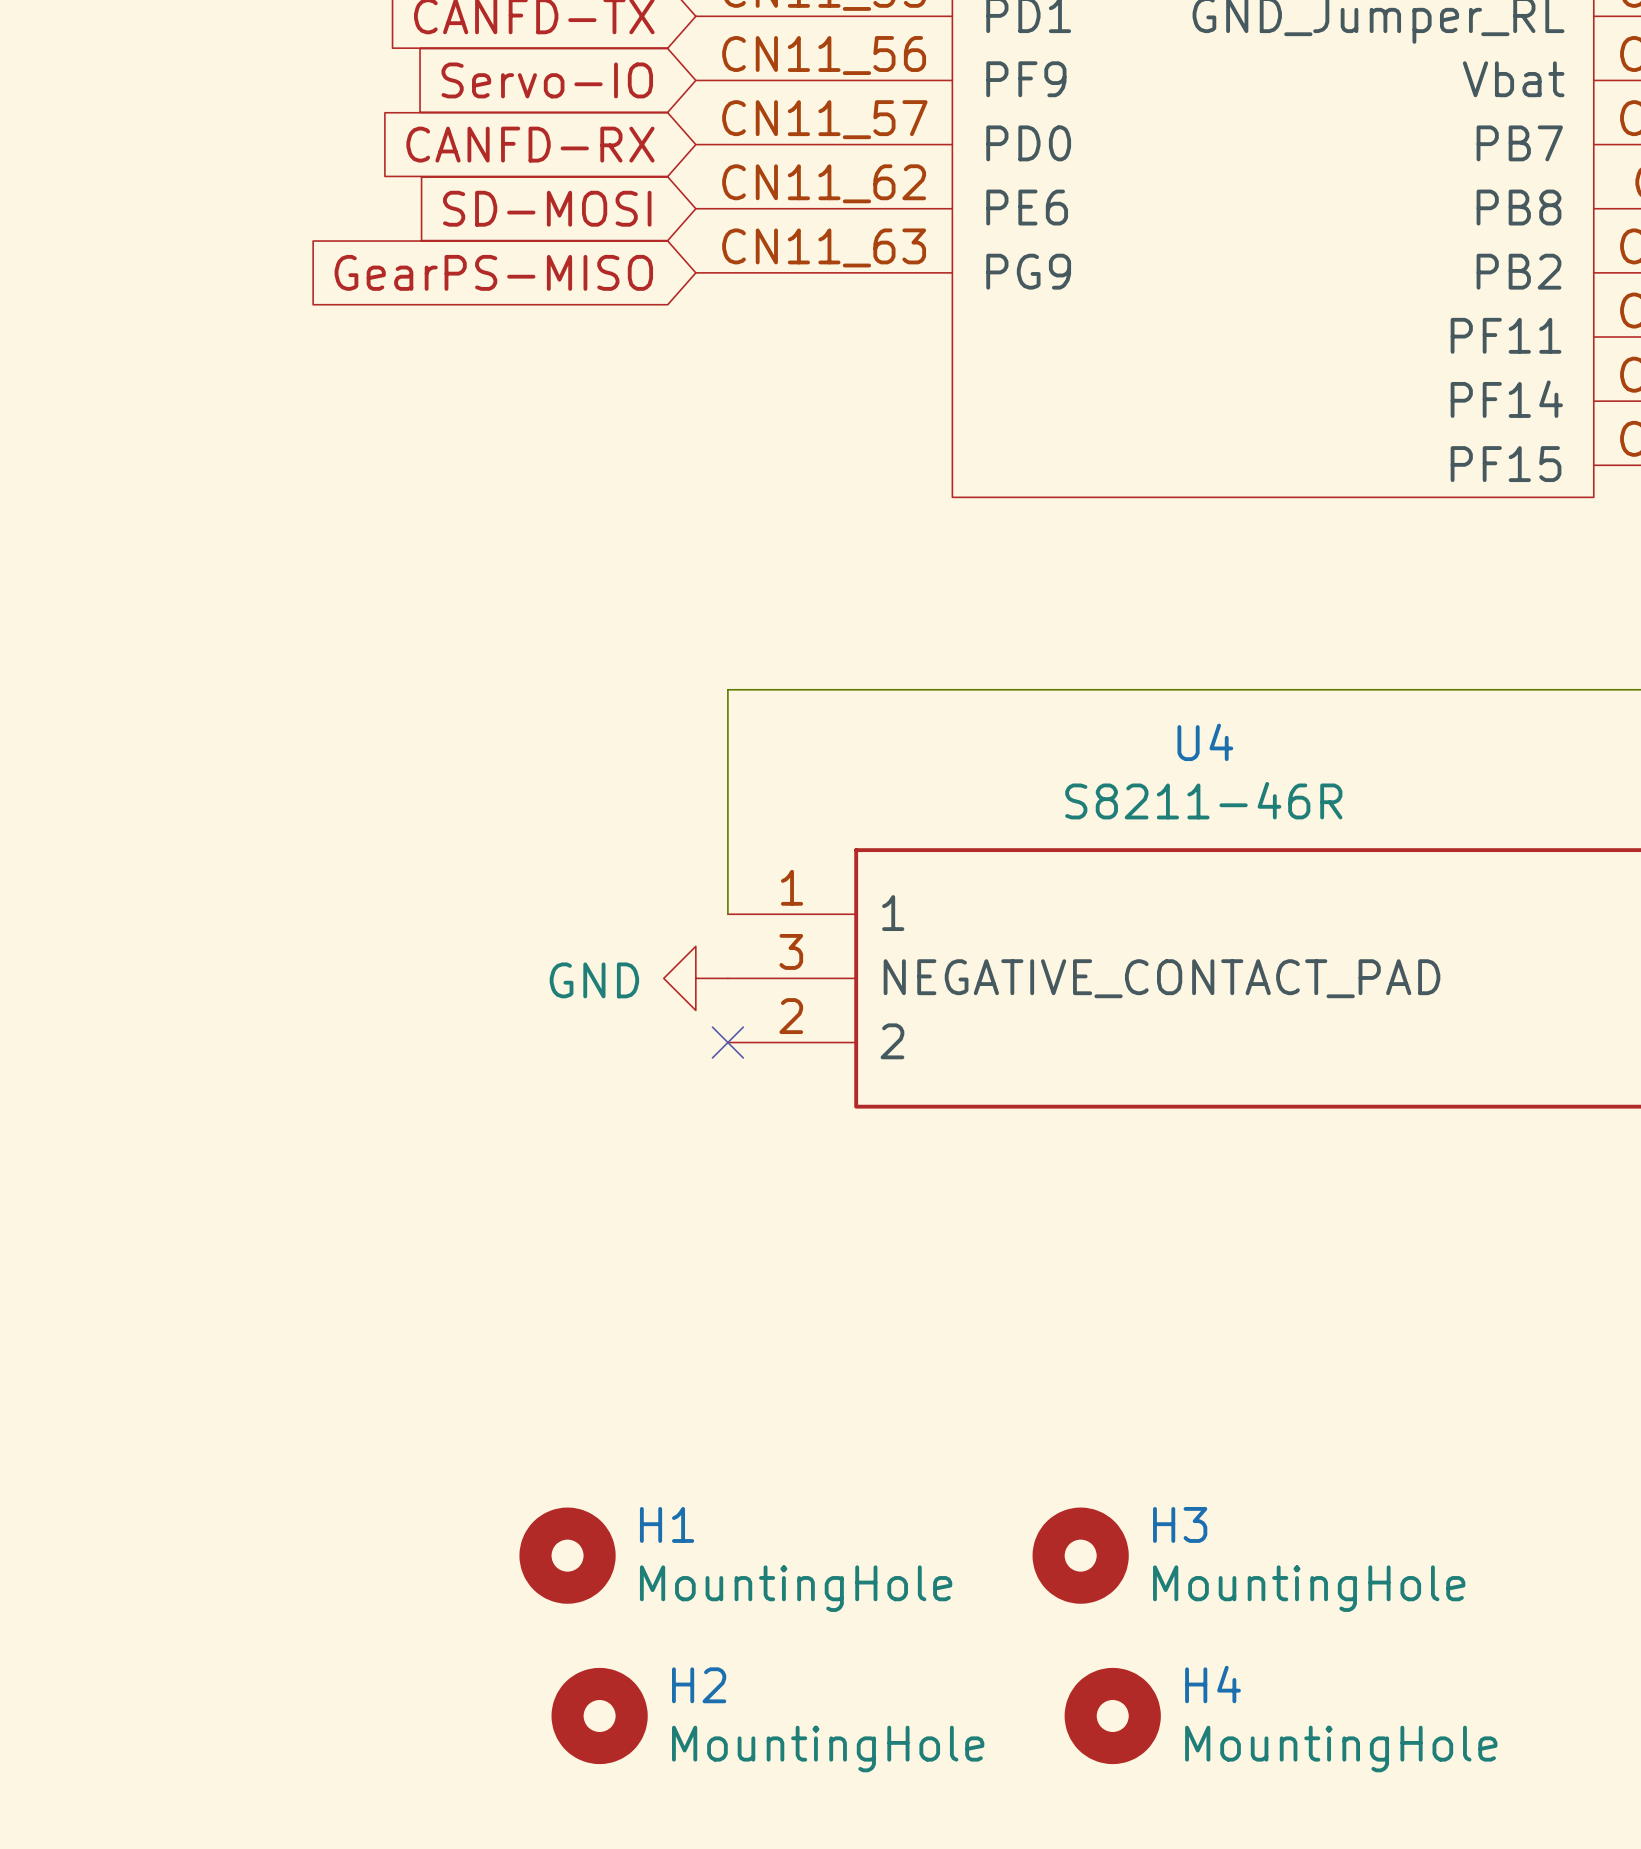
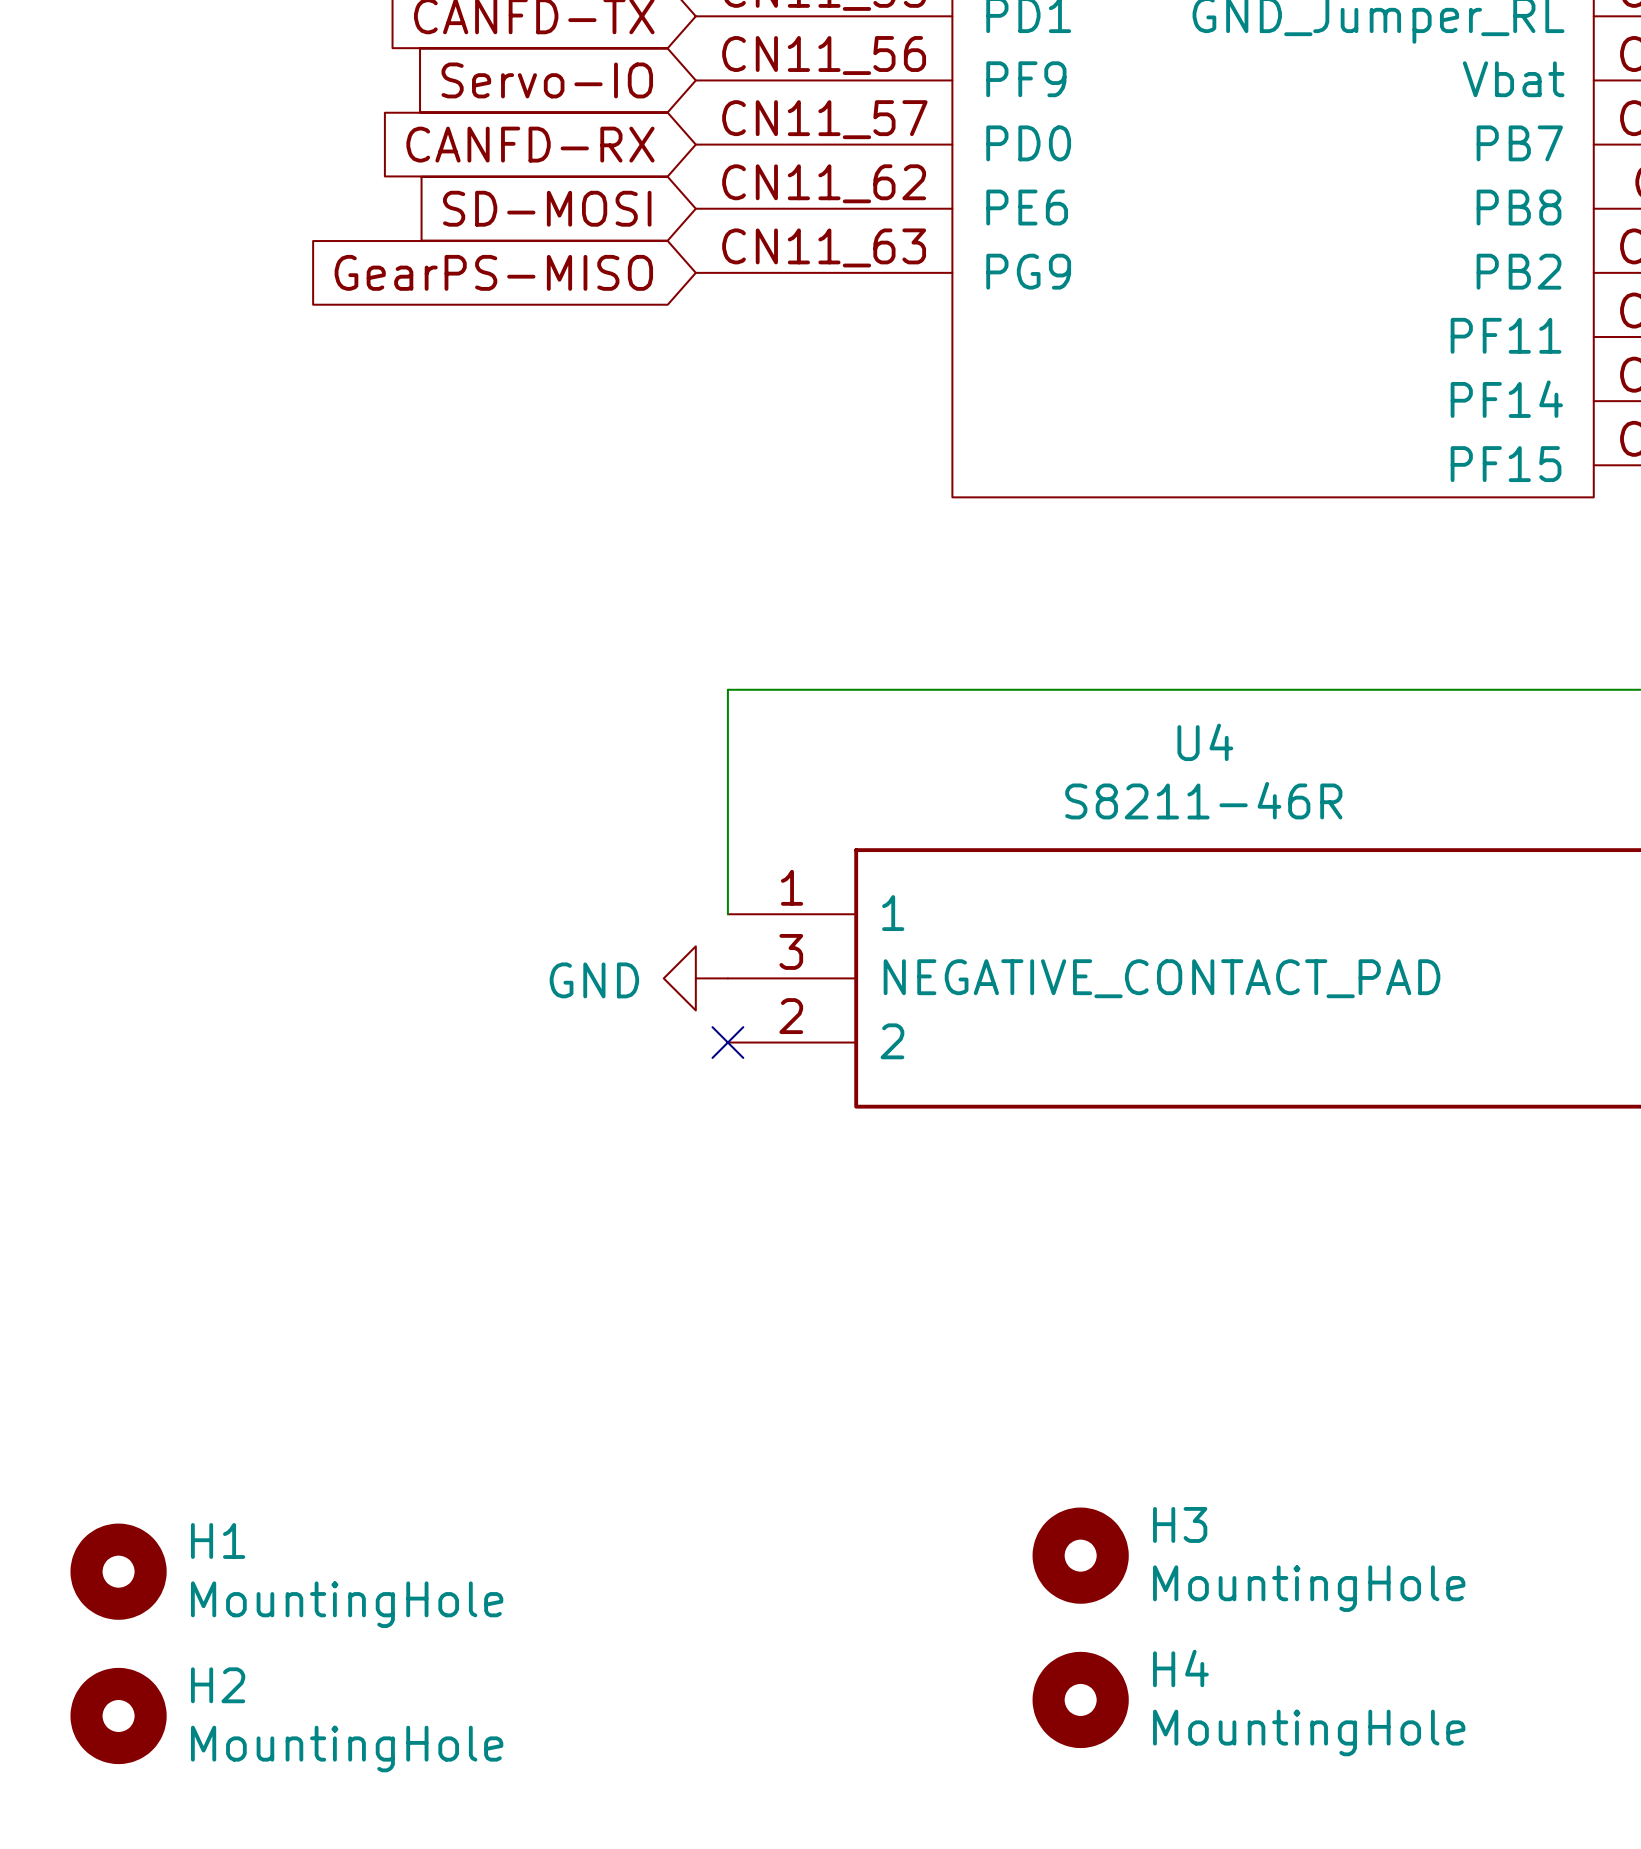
H1 position: (567, 1555) -> (118, 1571)
H2 position: (599, 1715) -> (118, 1715)
H4 position: (1112, 1715) -> (1080, 1699)

